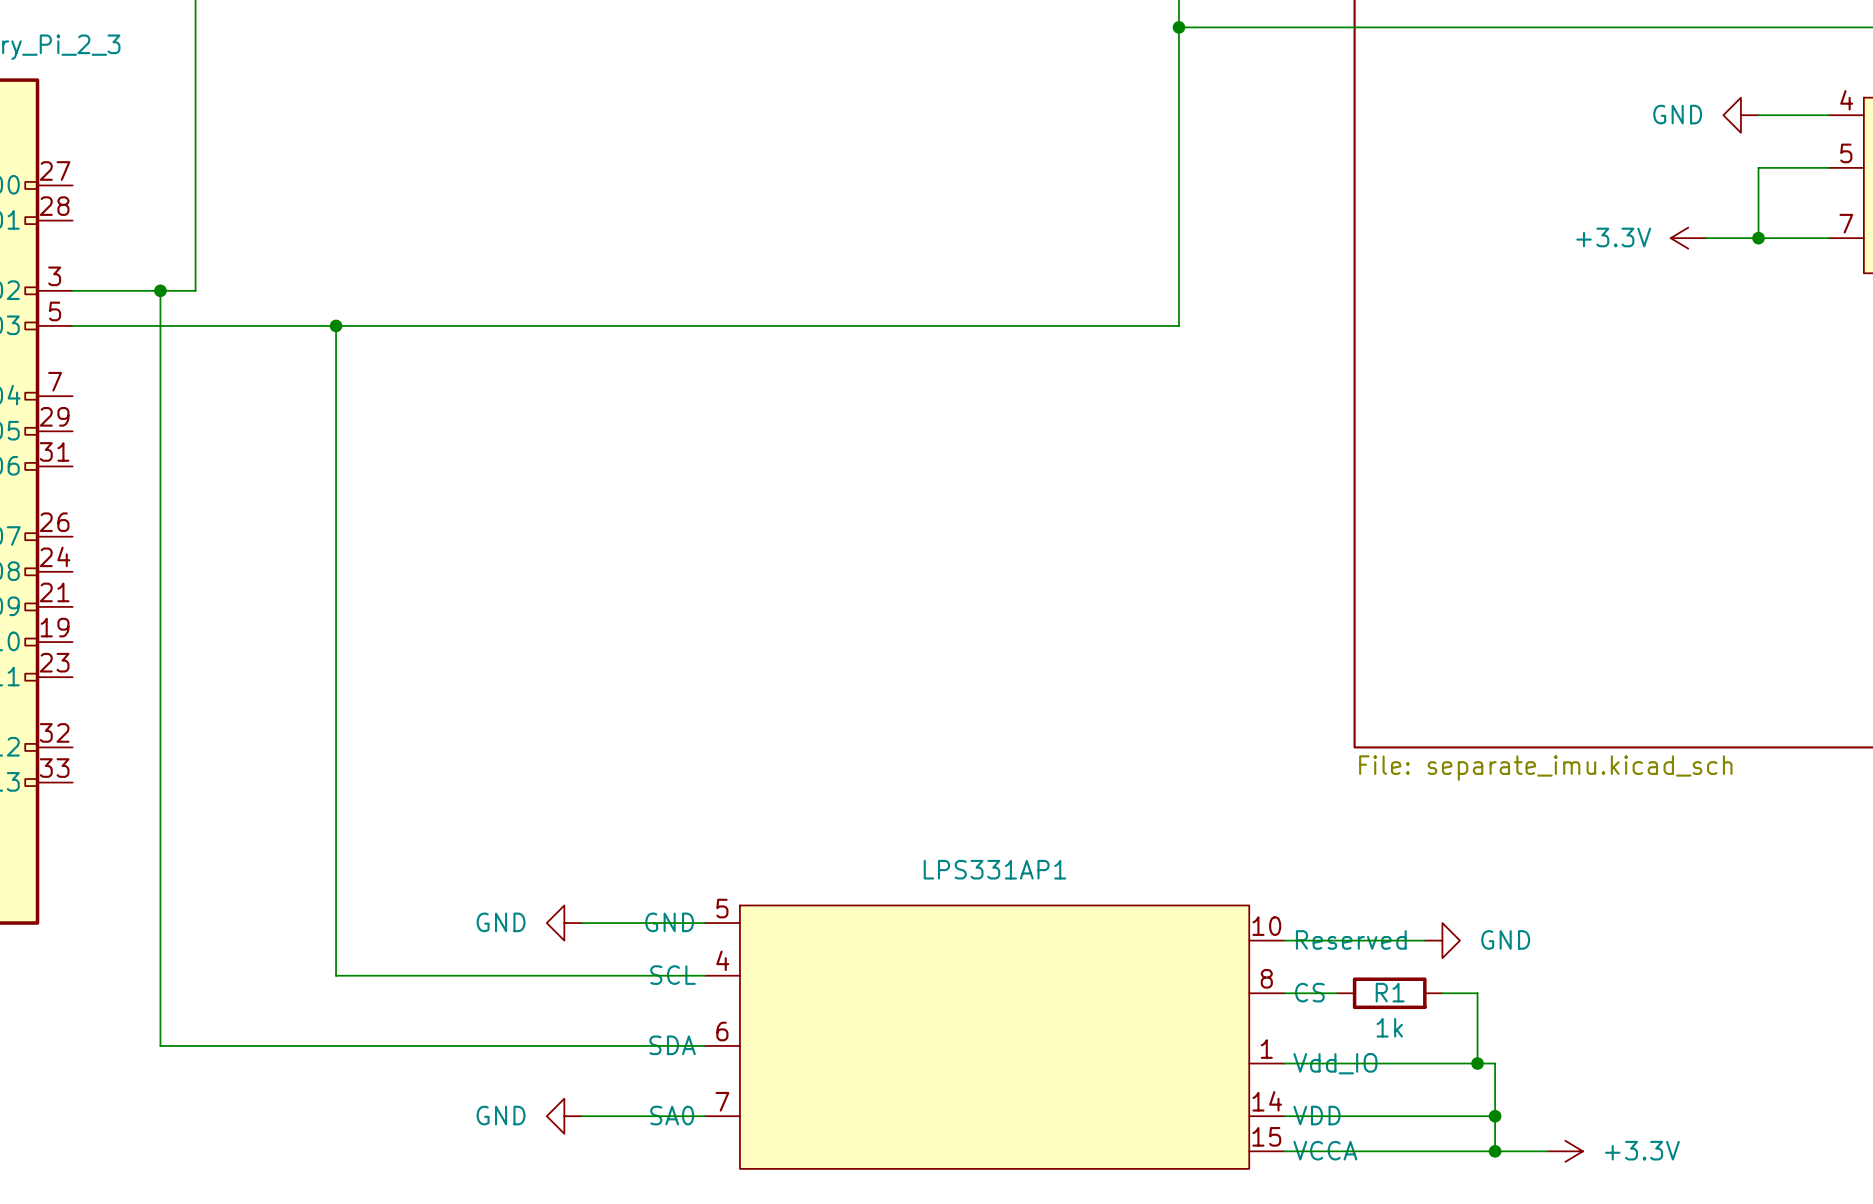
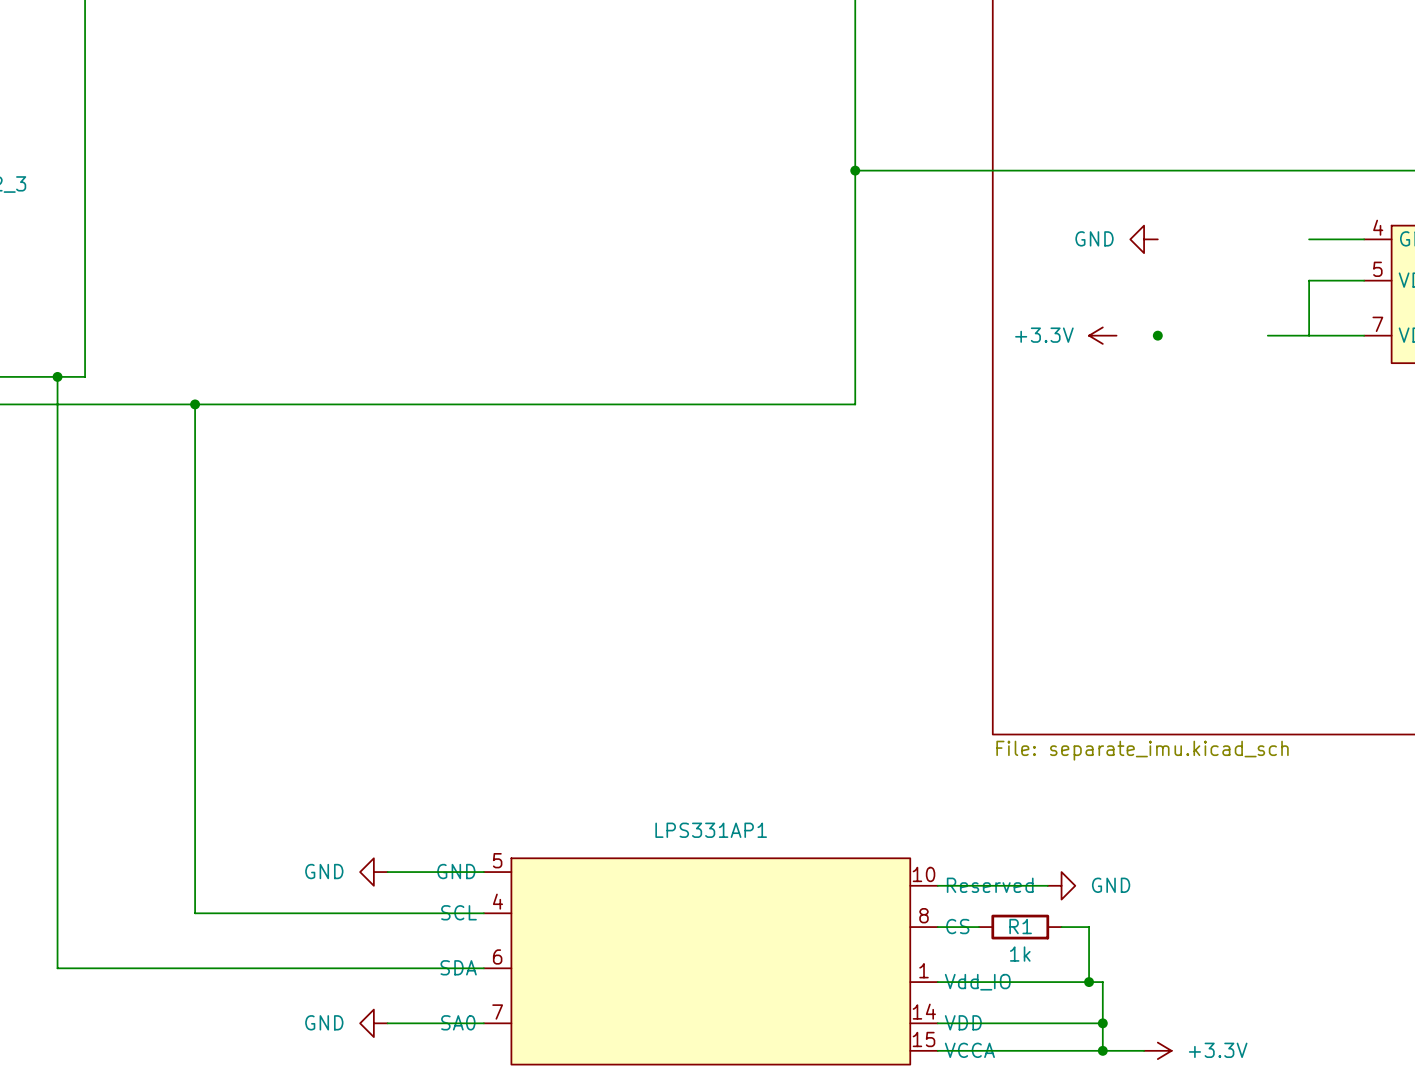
power symbol position: GND (1740, 115) -> GND (1144, 239)
junction: none -> (1157, 335)
power symbol position: +3.3V (1688, 238) -> +3.3V (1102, 335)
junction: (1758, 238) -> none

